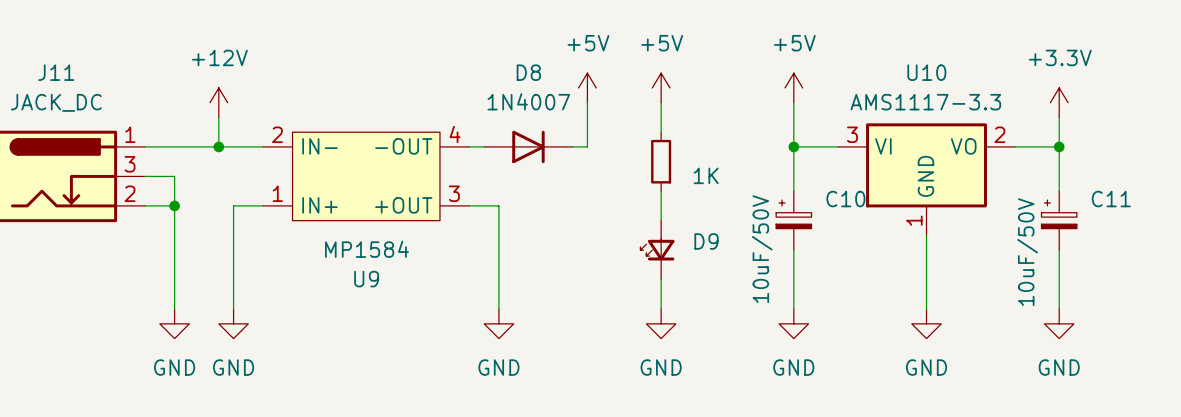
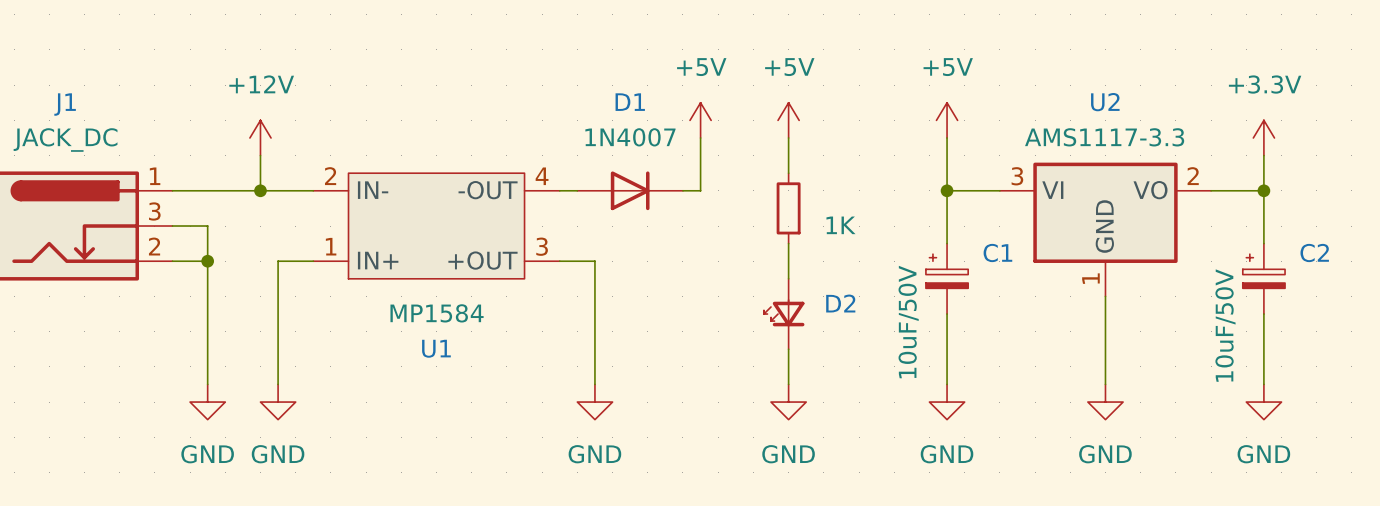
J11 name: J11 (56, 72) -> J1 (65, 104)
D8 name: D8 (528, 72) -> D1 (630, 102)
U10 name: U10 (926, 72) -> U2 (1105, 102)
C10 name: C10 (845, 199) -> C1 (997, 252)
C11 name: C11 (1111, 199) -> C2 (1314, 252)
D9 name: D9 (706, 241) -> D2 (840, 303)
U9 name: U9 (366, 279) -> U1 (436, 348)

